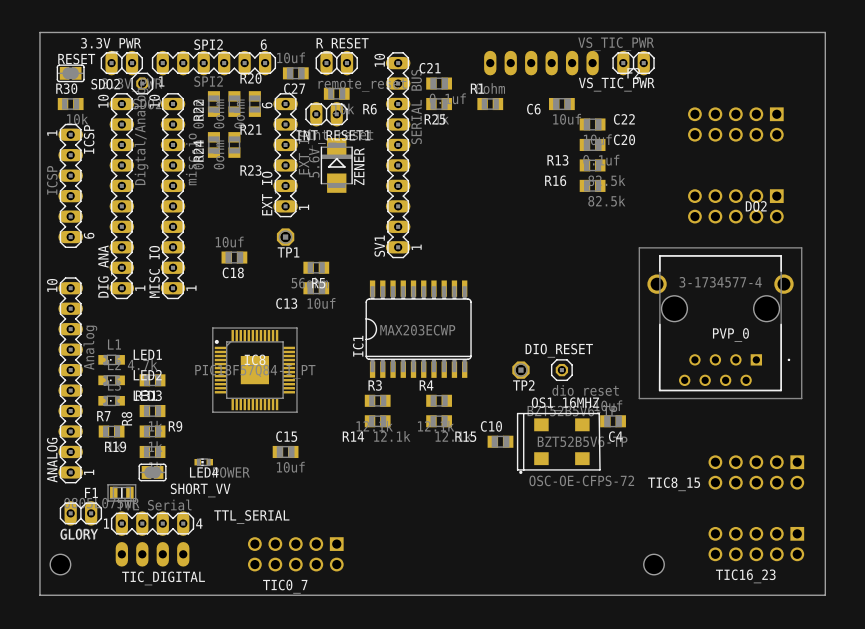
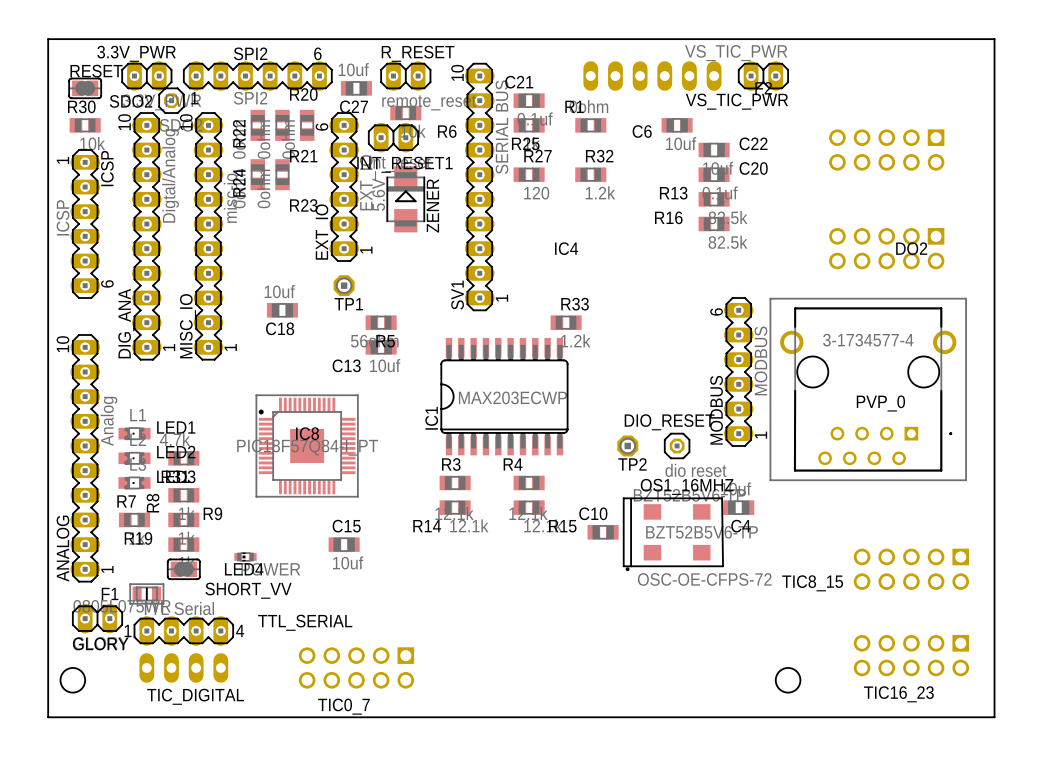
R27: none -> 120 (529, 174)
R32: none -> 1.2k (590, 174)
IC4: none -> (566, 248)
R33: none -> 1.2k (566, 322)
MODBUS: none -> MODBUS (738, 371)

